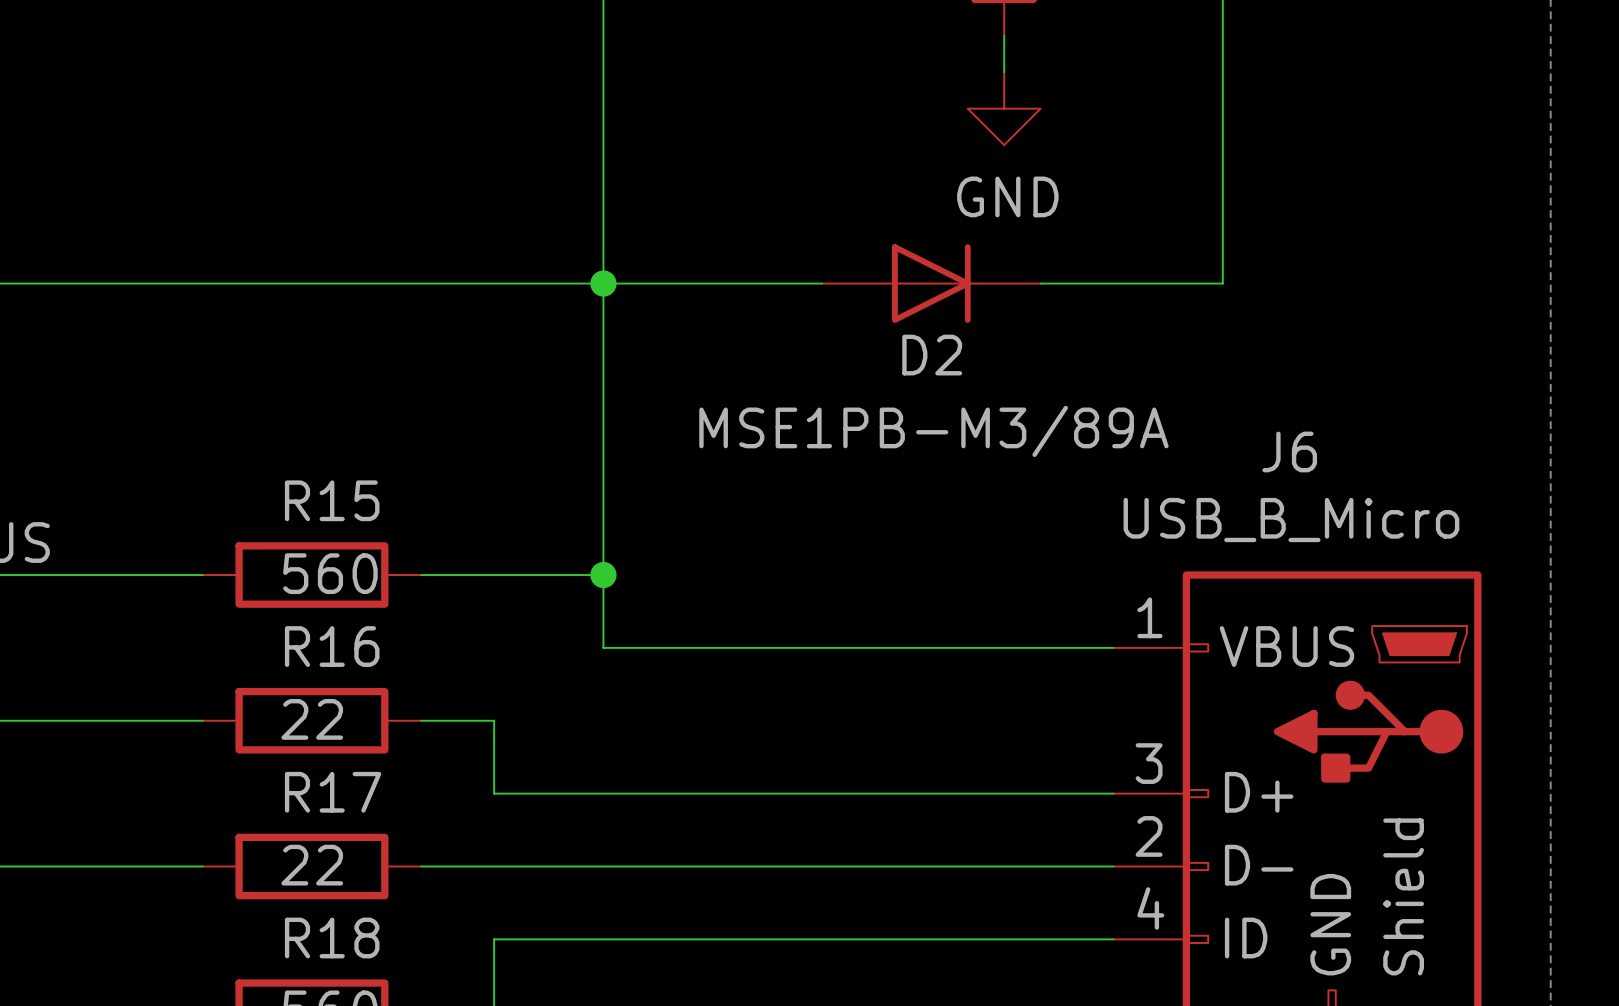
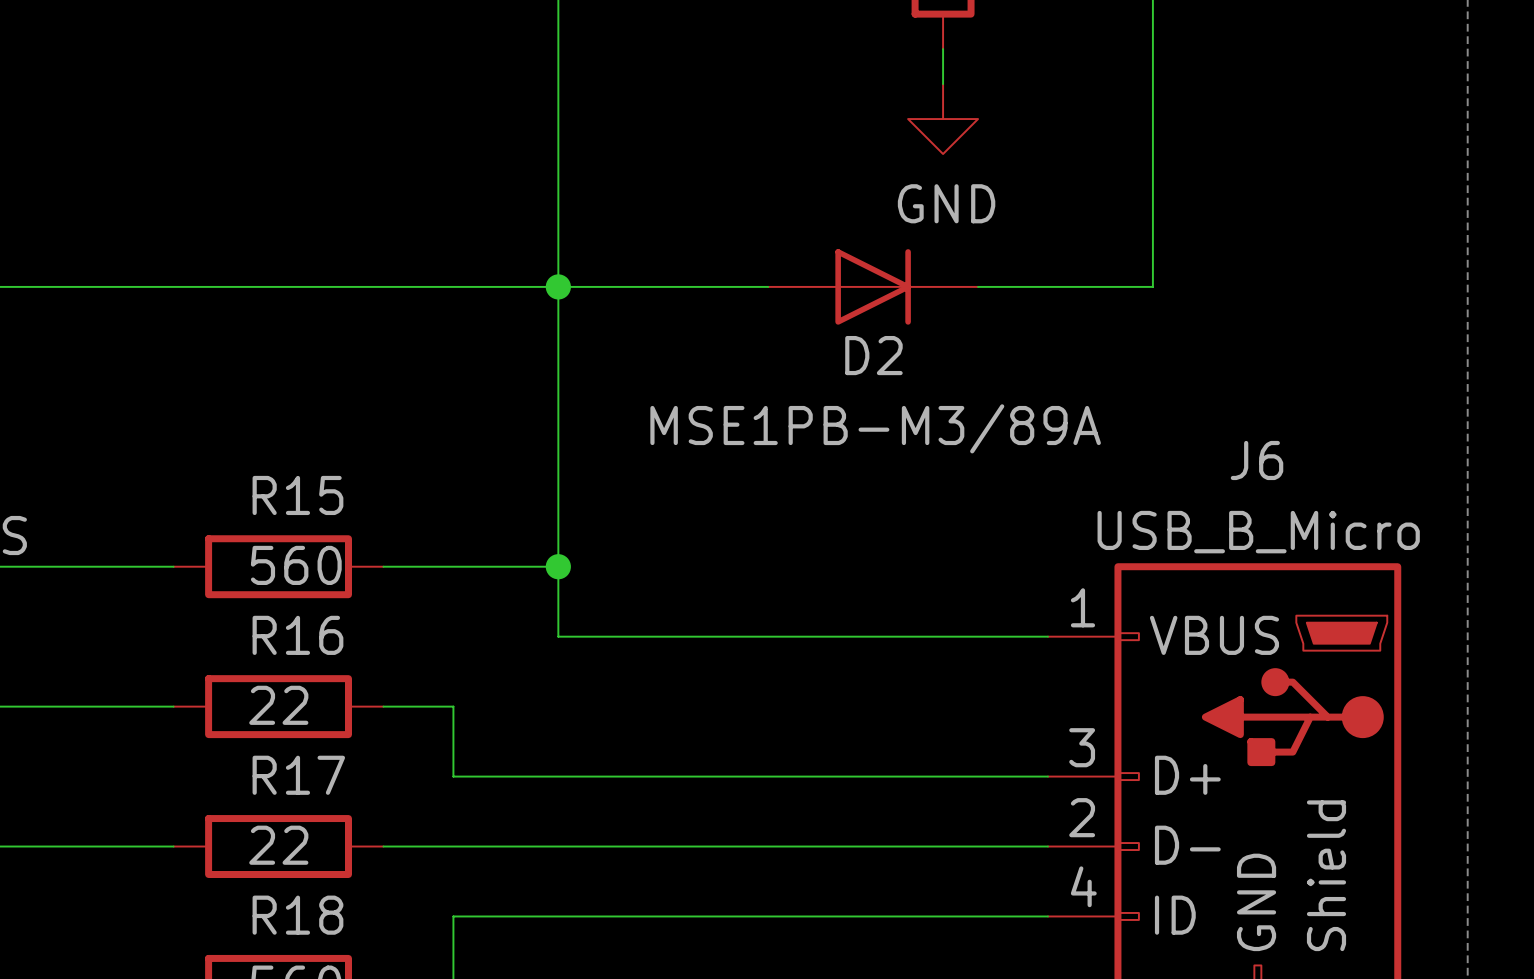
J6 name position: J6 (1289, 451) -> J6 (1257, 460)
J6 value position: USB_B_Micro (1291, 520) -> USB_B_Micro (1258, 532)

